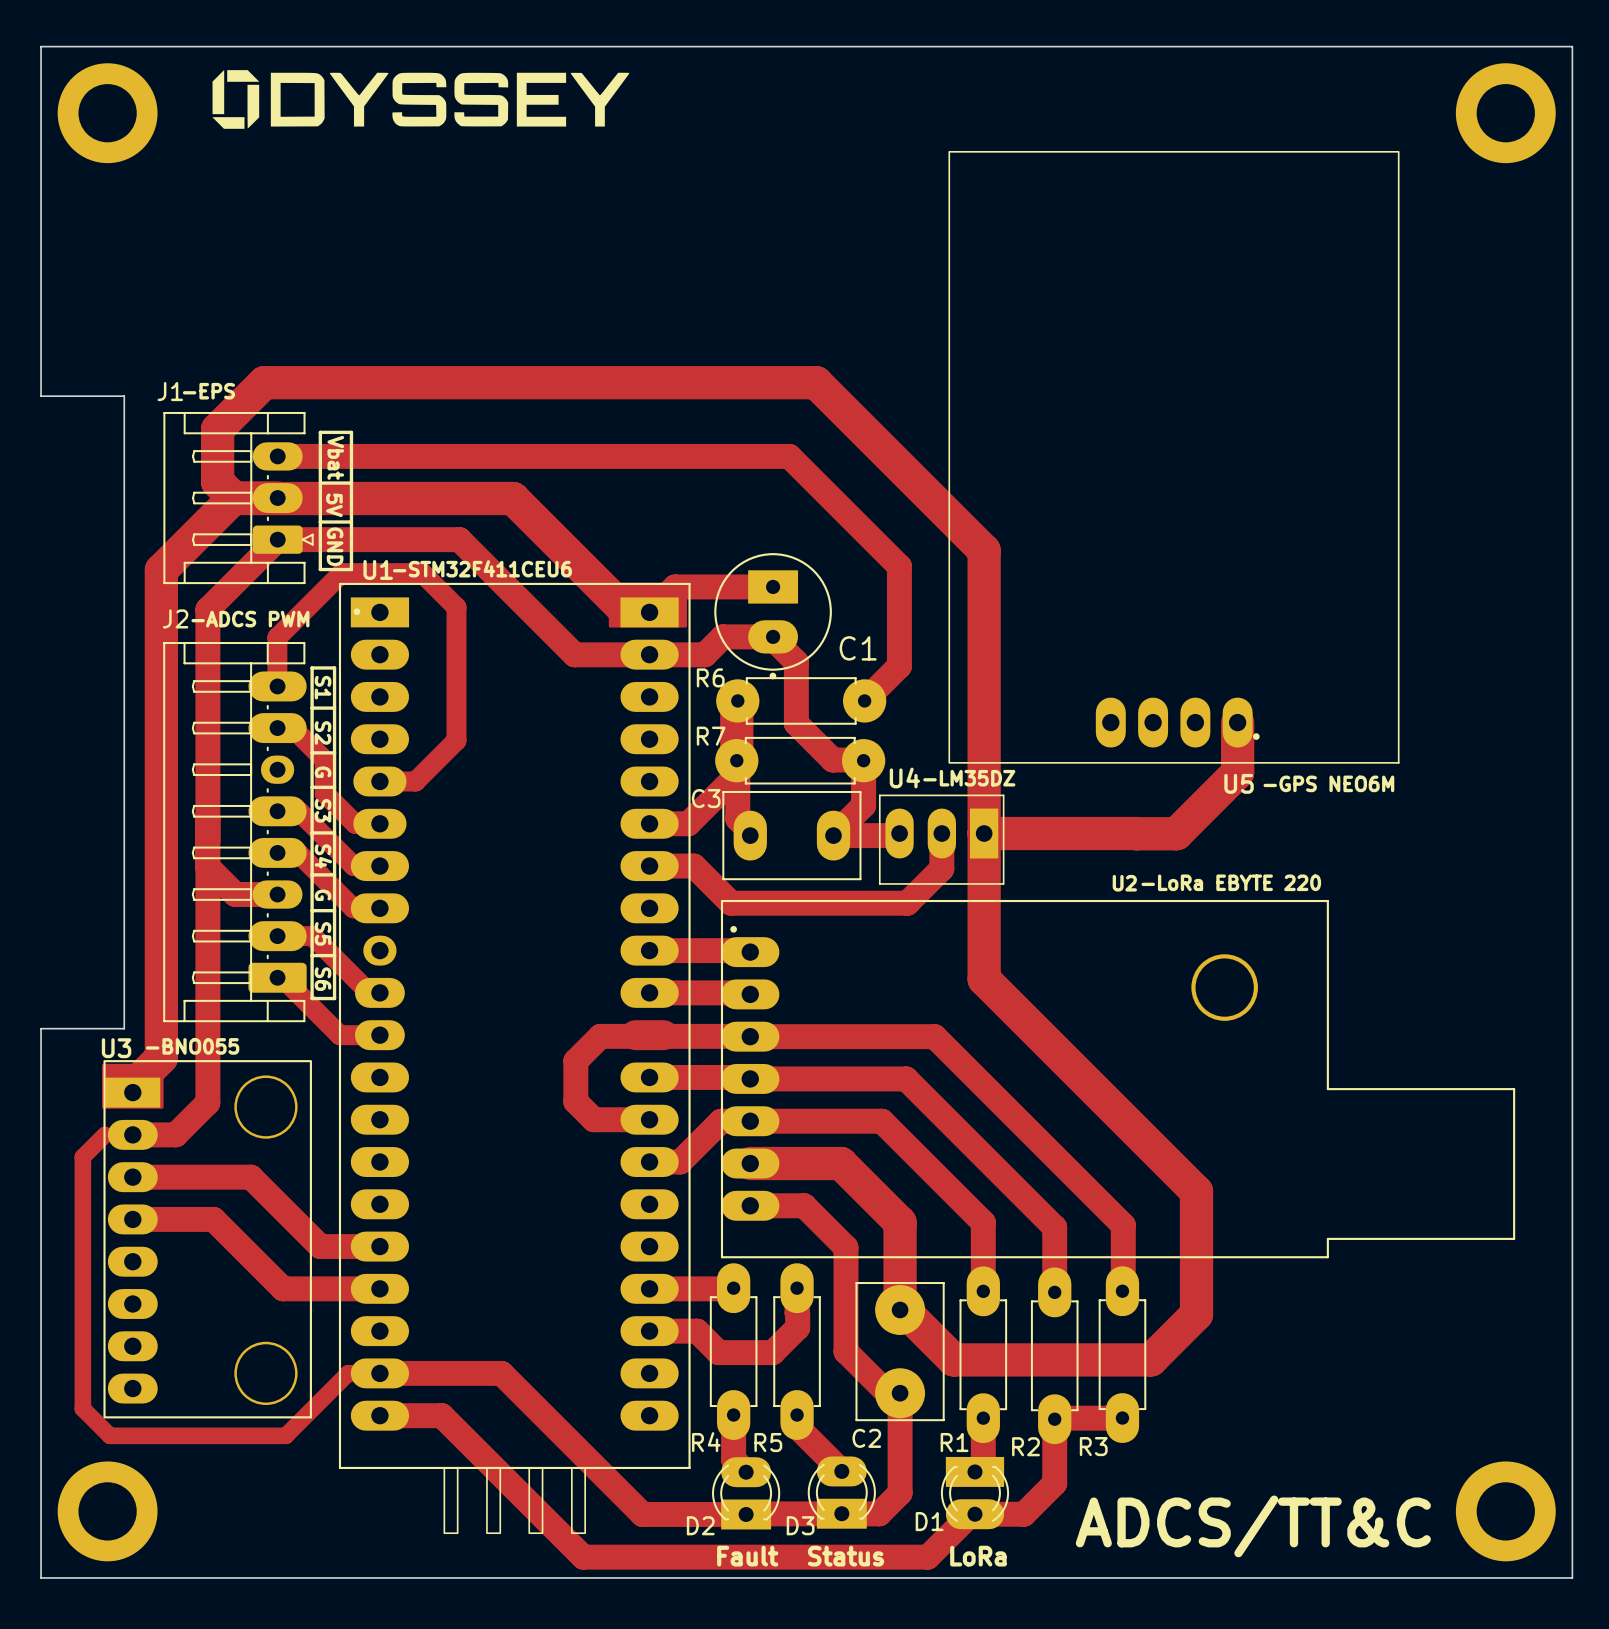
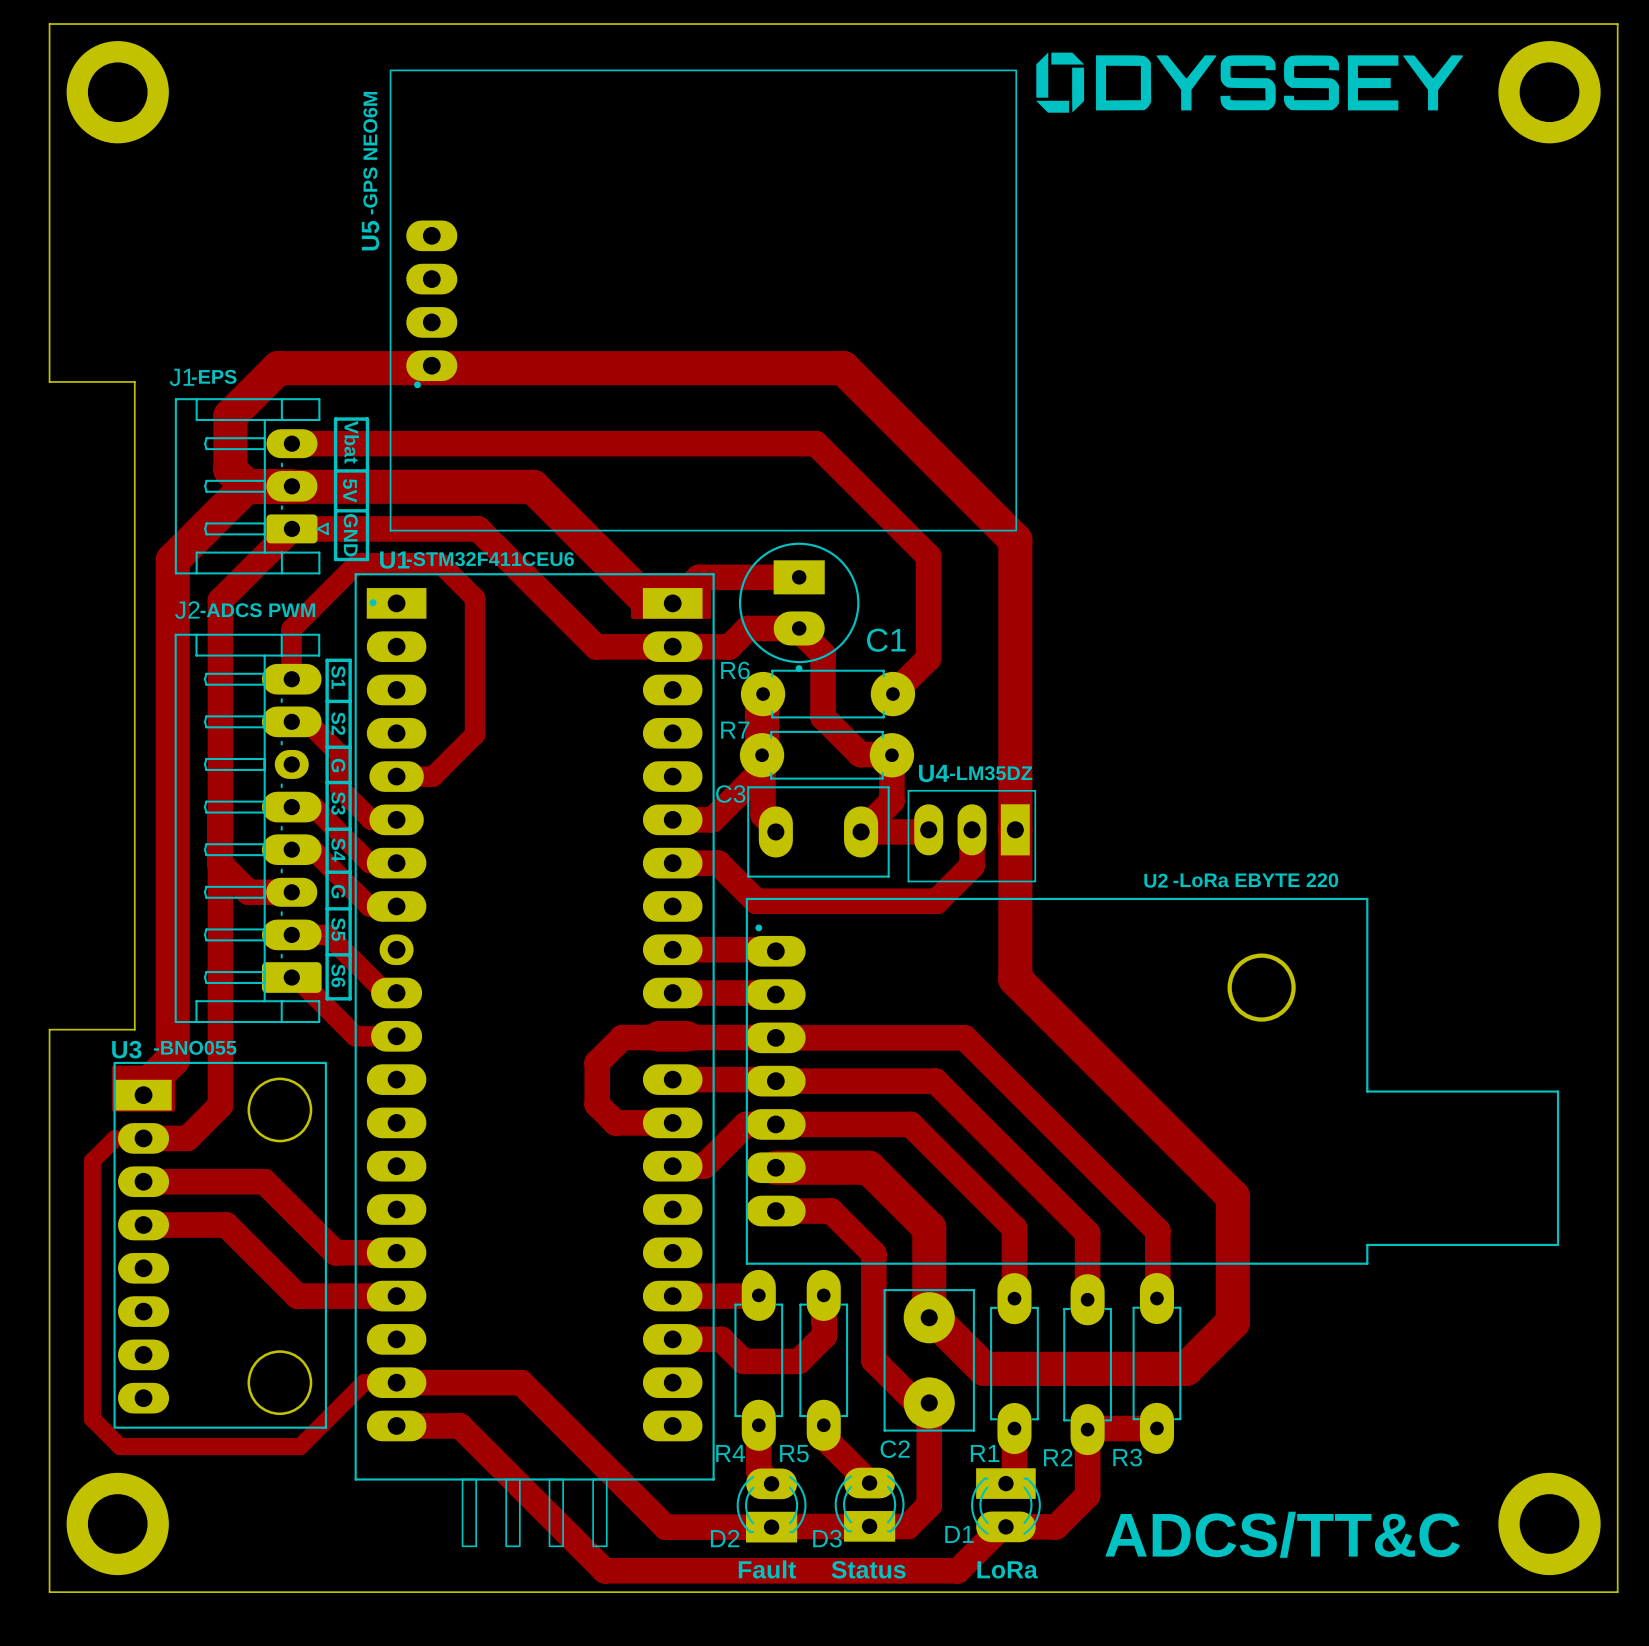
drawing: [212, 69, 630, 129] -> none
drawing: none -> [1036, 52, 1464, 113]
text: none -> -GPS NEO6M (370, 153)
U5 rotation: 0° (1173, 457) -> 90° clockwise (703, 300)
U5 position: (1173, 457) -> (703, 300)
top track: (1237, 722) (1237, 772) (1176, 833) (984, 833) -> none
U5 name position: U5 (1239, 783) -> U5 (370, 235)
text: -GPS NEO6M (1328, 783) -> none

